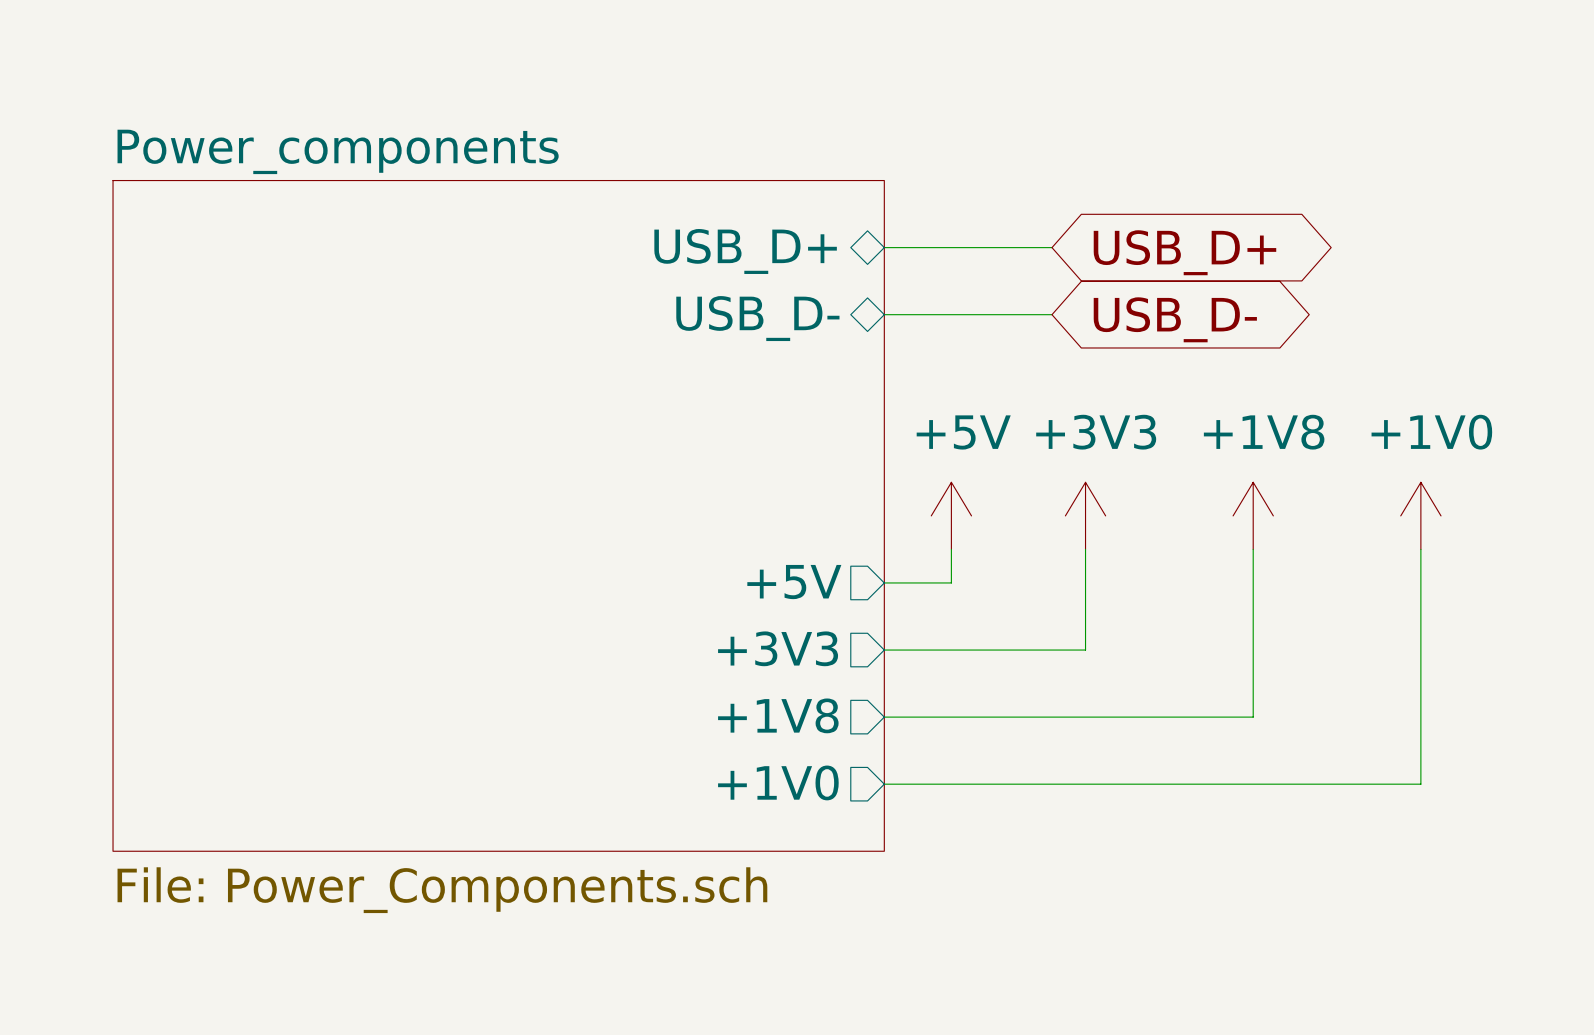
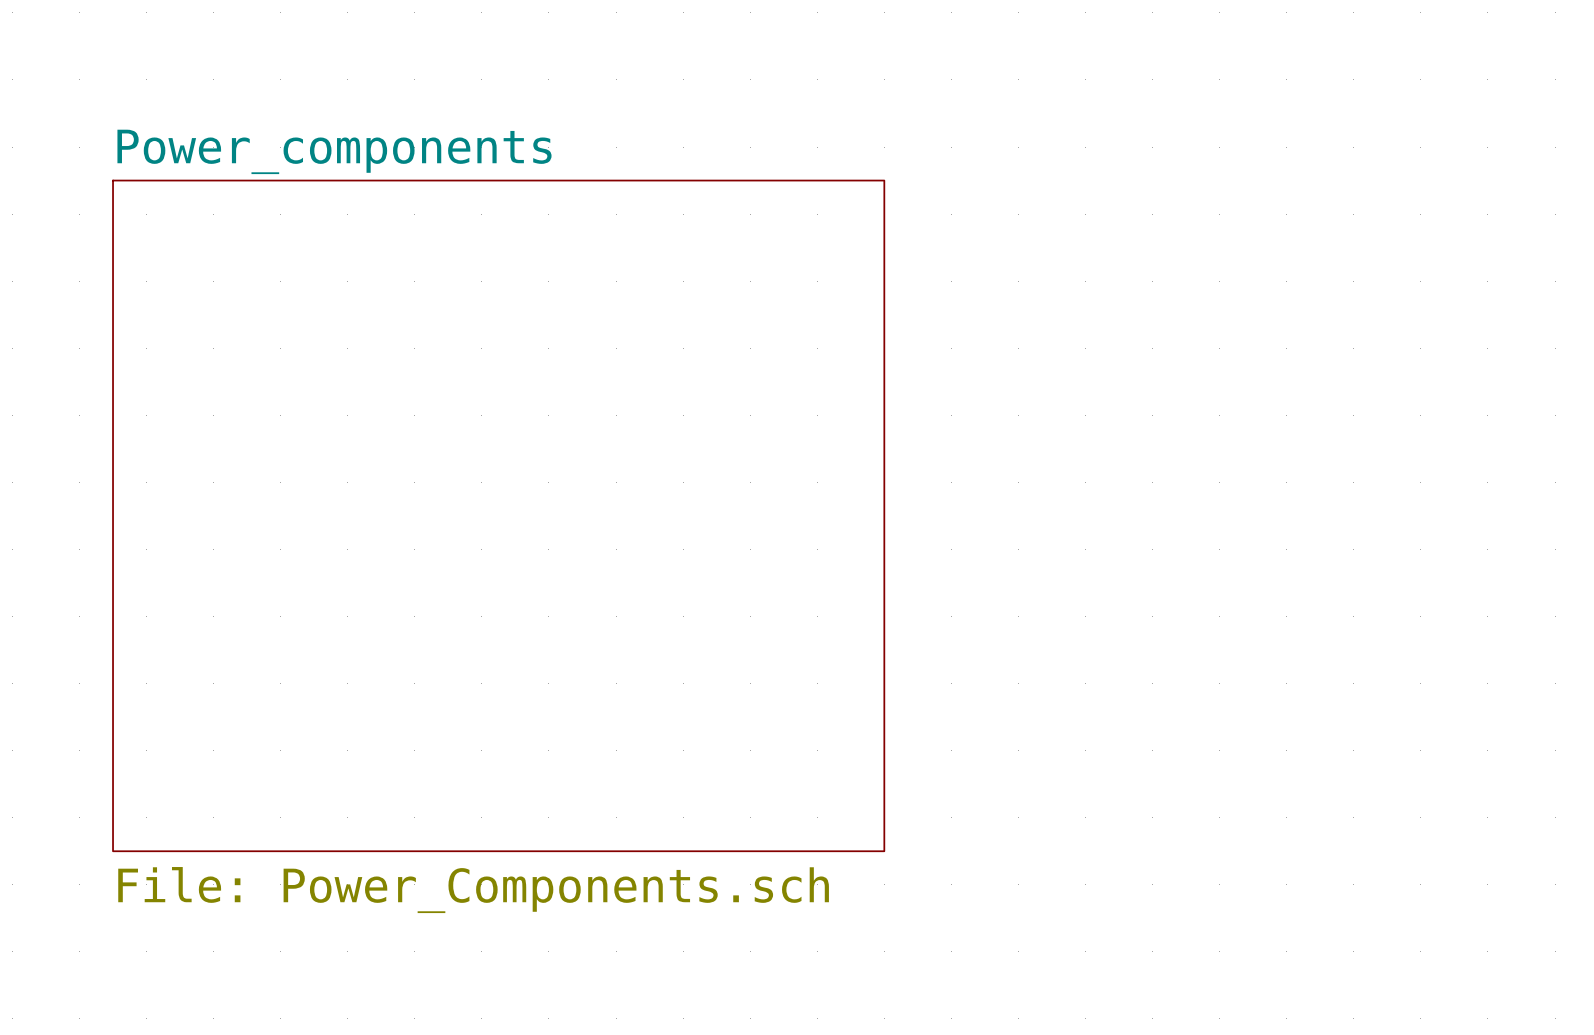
wire: (884, 247) (1052, 247) -> none
sheet pin: USB_D+ (745, 251) -> none
global label: USB_D+ (1184, 252) -> none
wire: (884, 314) (1052, 314) -> none
sheet pin: USB_D- (757, 318) -> none
global label: USB_D- (1175, 319) -> none
power symbol: +5V (951, 515) -> none
power symbol: +3V3 (1085, 515) -> none
power symbol: +1V8 (1253, 515) -> none
power symbol: +1V0 (1420, 515) -> none
wire: (951, 549) (951, 582) (884, 582) -> none
wire: (1085, 549) (1085, 650) (884, 650) -> none
wire: (1253, 549) (1253, 717) (884, 717) -> none
wire: (1420, 549) (1420, 784) (884, 784) -> none
sheet pin: +5V (794, 582) -> none
sheet pin: +3V3 (778, 648) -> none
sheet pin: +1V8 (778, 715) -> none
sheet pin: +1V0 (778, 782) -> none

